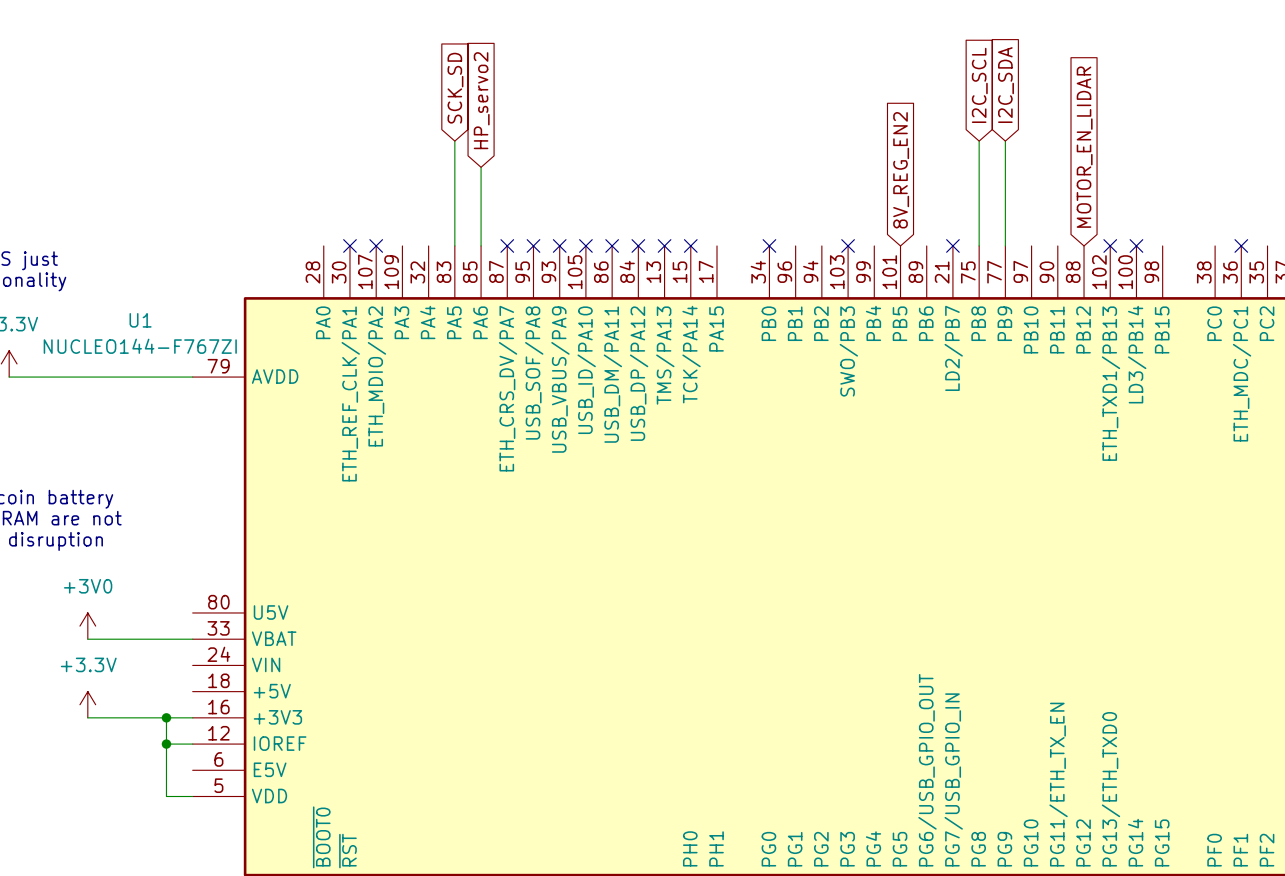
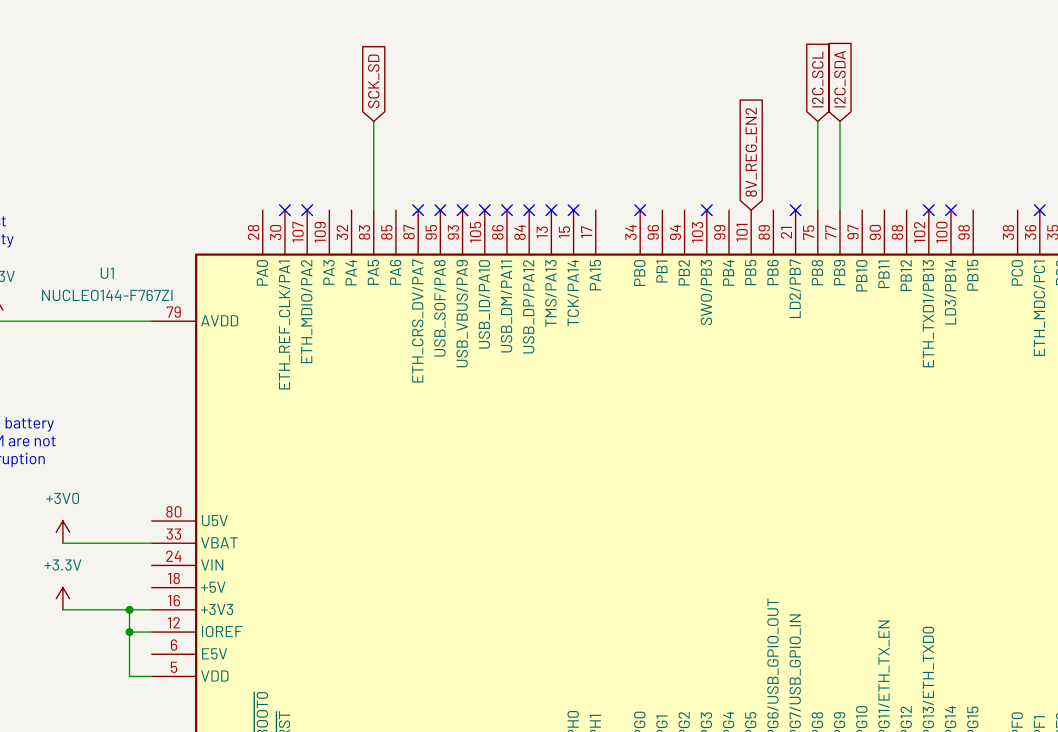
global label: HP_servo2 (481, 100) -> none
global label: MOTOR_EN_LIDAR (1084, 147) -> none
wire: (481, 167) (481, 245) -> none

